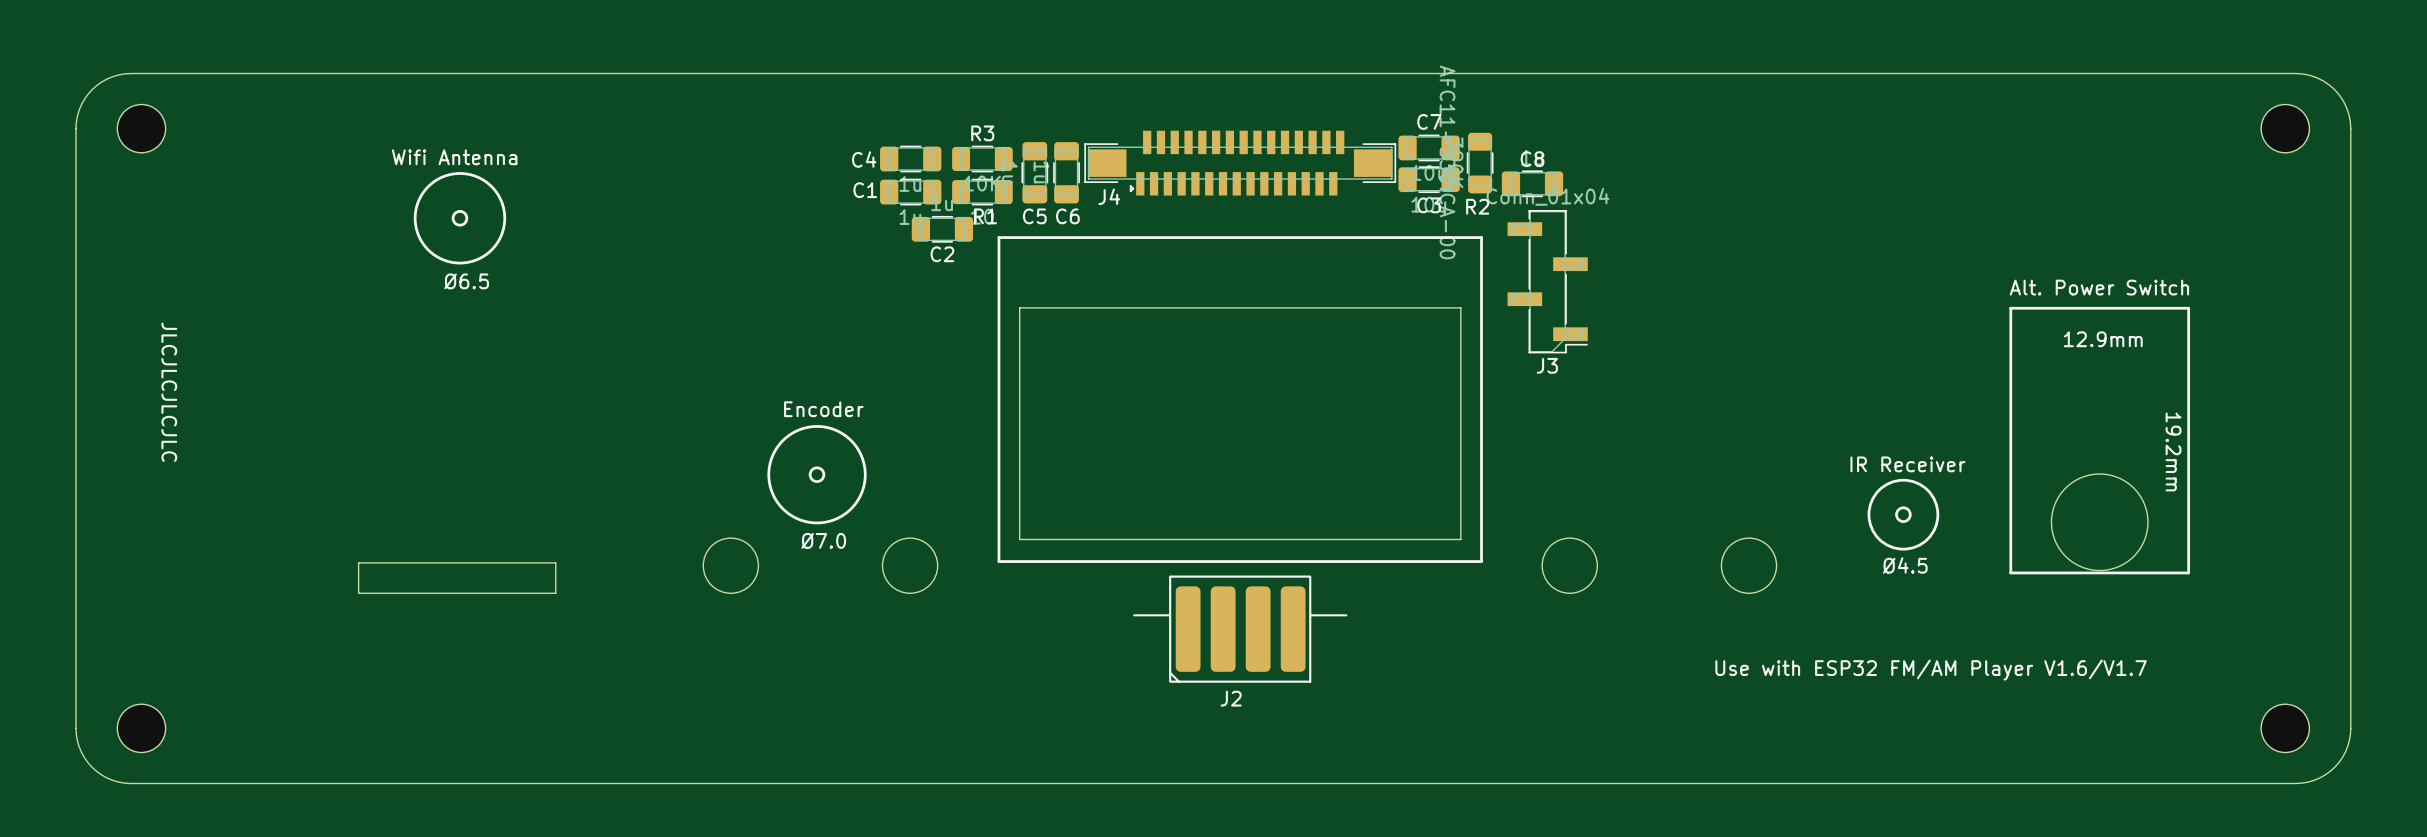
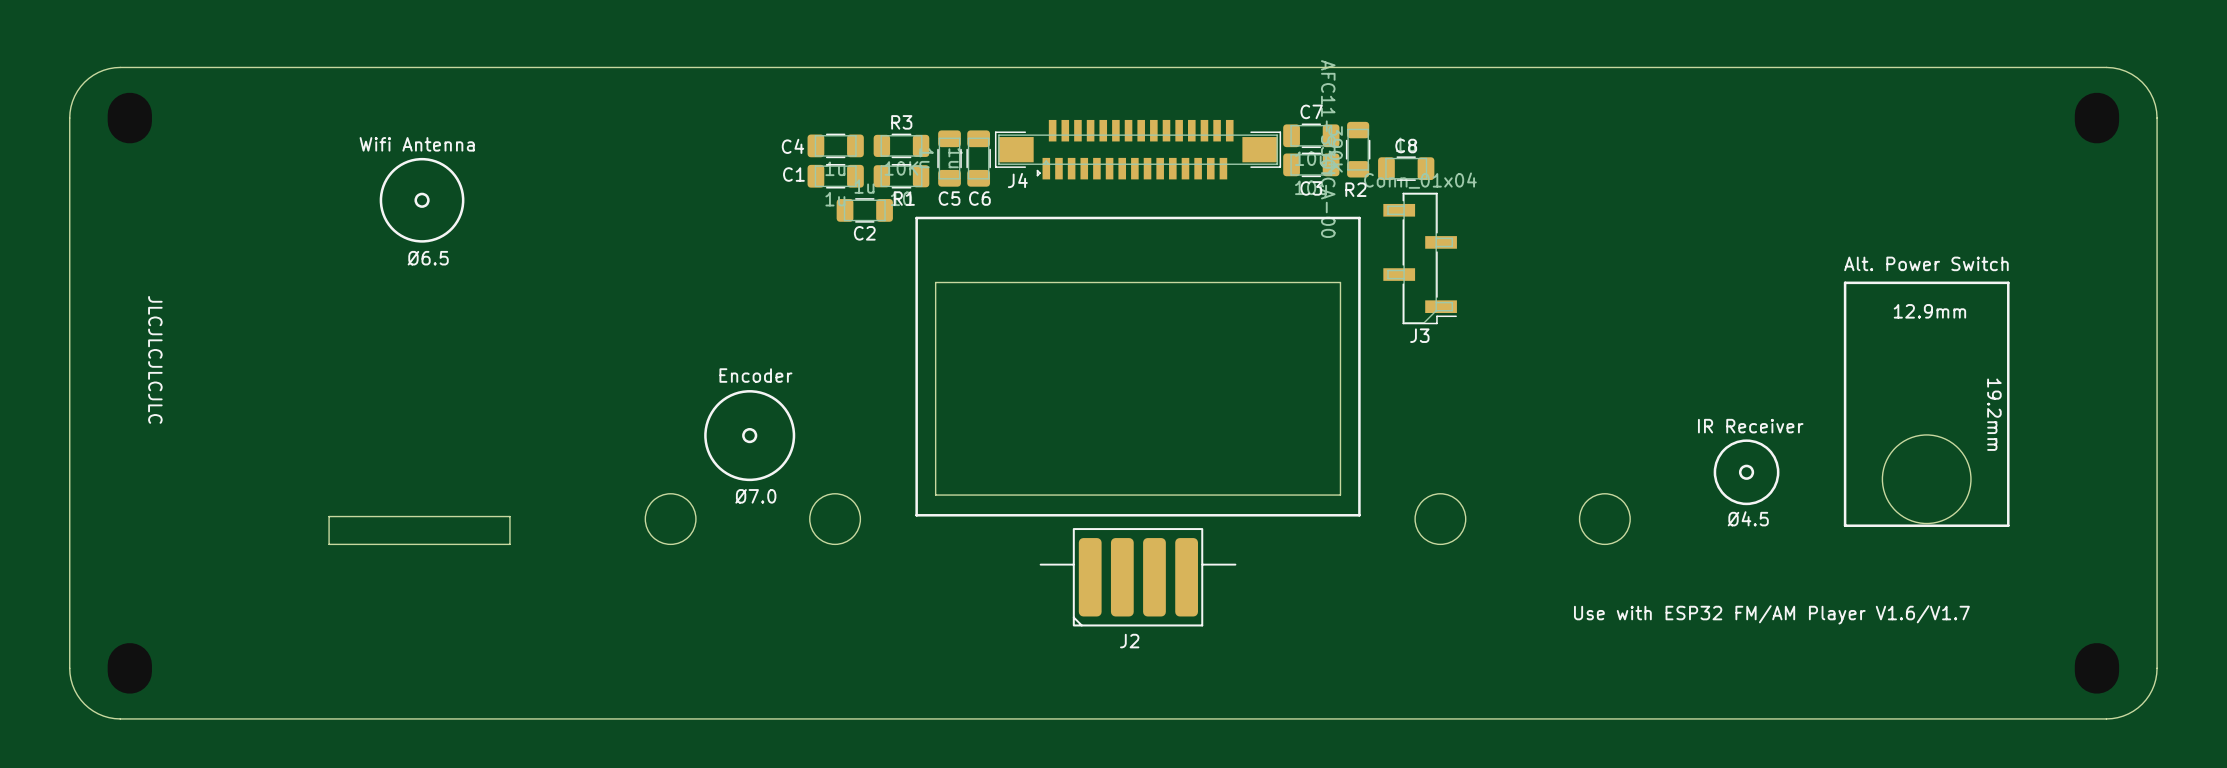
part footprint: [117, 104, 166, 153] -> [107, 92, 152, 144]
part footprint: [2261, 104, 2310, 153] -> [2074, 92, 2120, 144]
part footprint: [117, 704, 166, 753] -> [107, 643, 152, 694]
part footprint: [2261, 704, 2310, 753] -> [2074, 643, 2120, 694]

